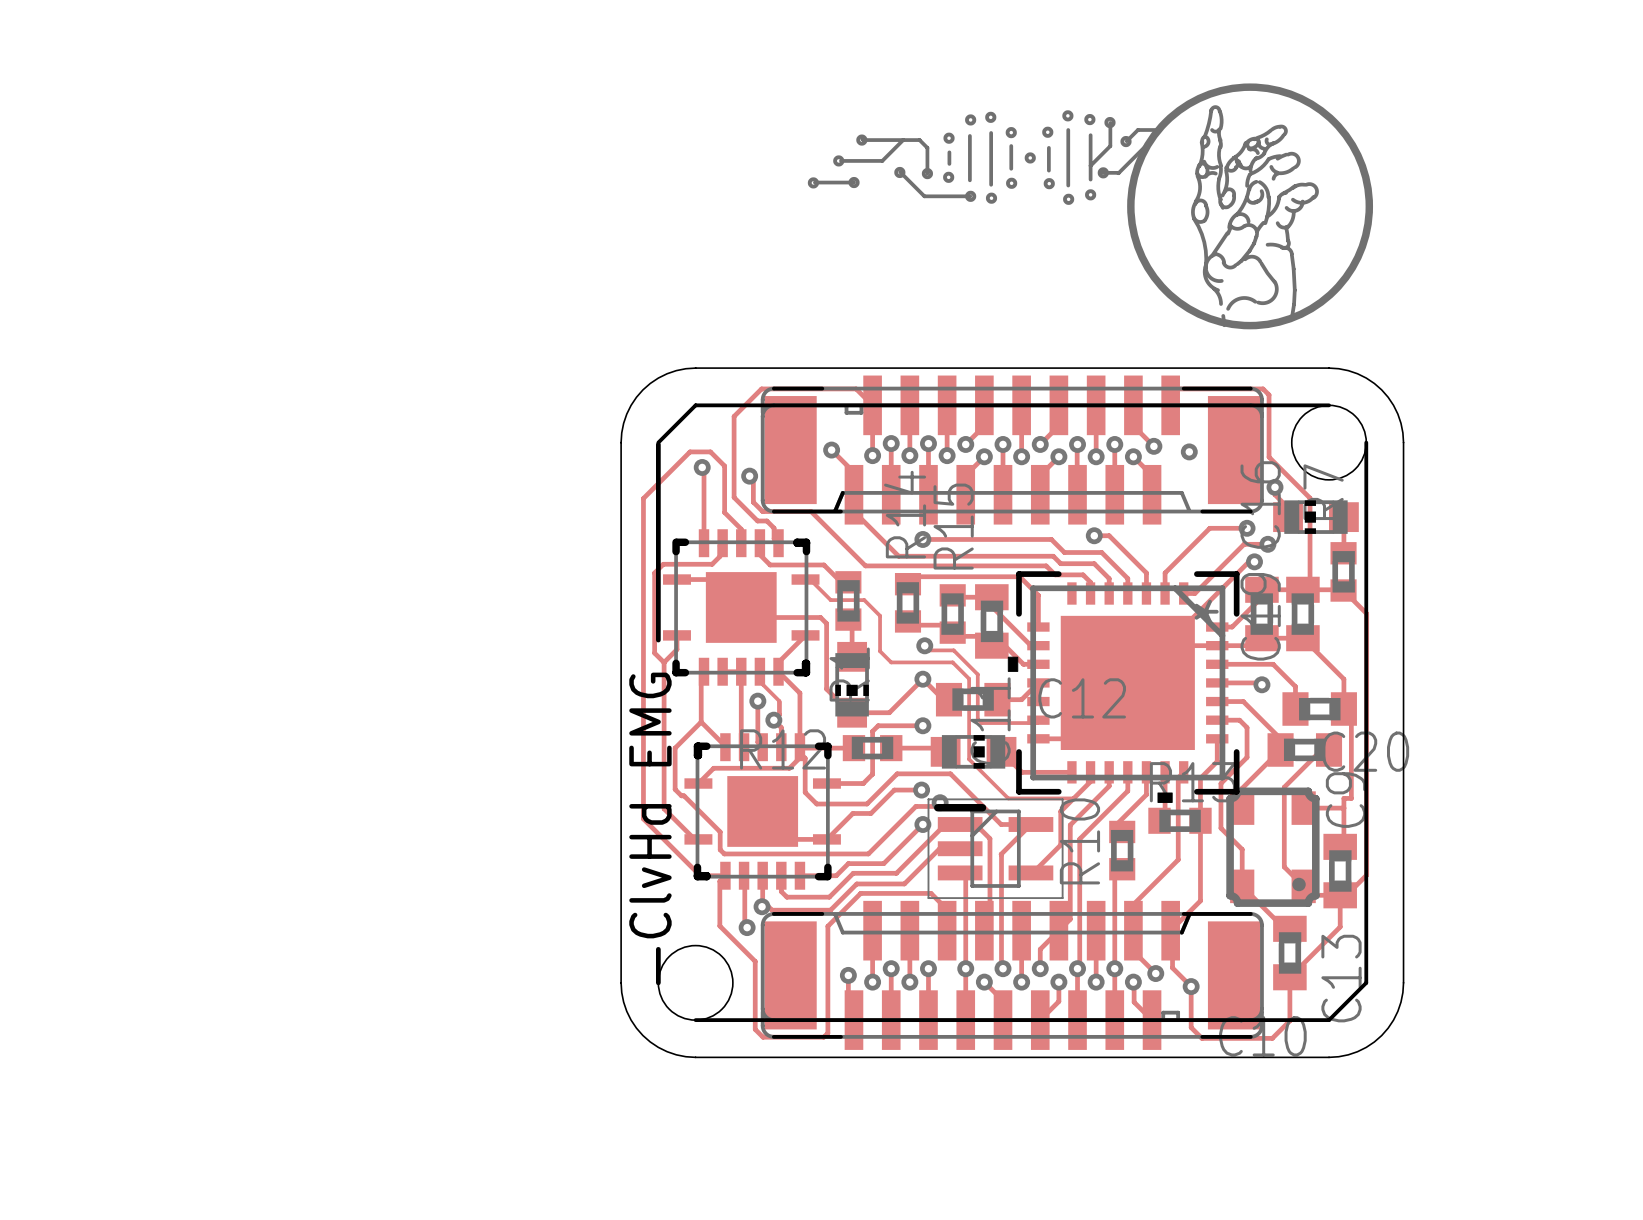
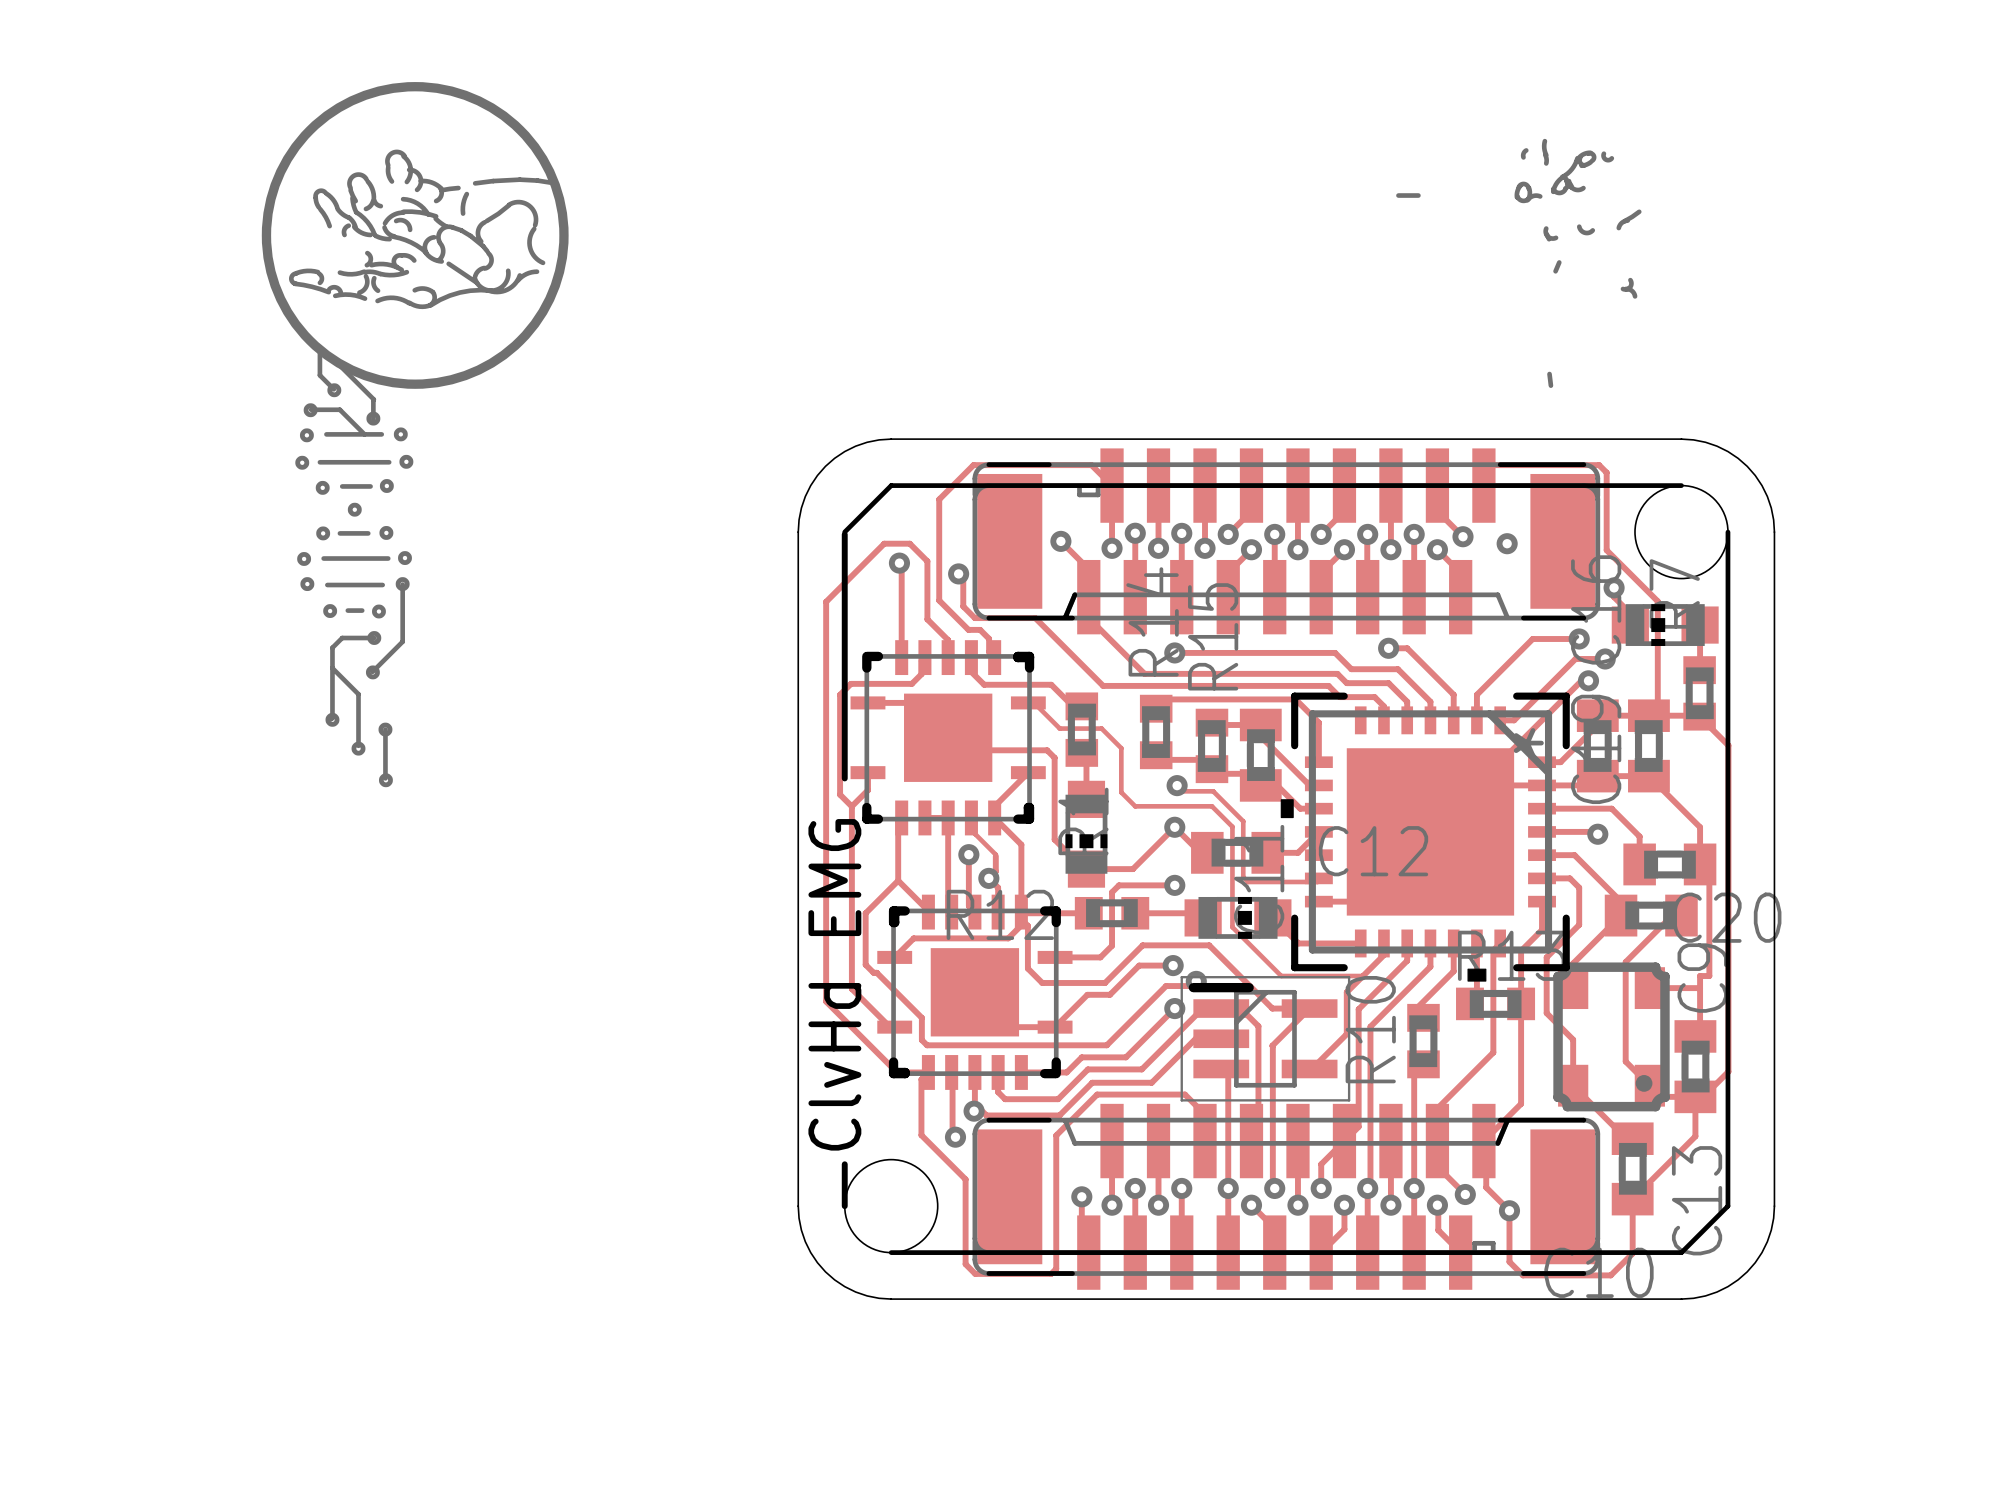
drawing: none -> [261, 82, 569, 788]
drawing: [807, 83, 1374, 330] -> none
line: (1211, 109) (1204, 137) -> none
line: (1211, 111) (1215, 107) (1219, 111) -> (388, 165) (387, 158) (392, 153) (398, 152) (404, 155)
line: (1219, 111) (1220, 128) -> none
line: (1110, 122) (1110, 146) (1090, 165) -> none
line: (1279, 126) (1272, 129) -> none
line: (1280, 126) (1285, 128) (1284, 134) -> none
line: (1219, 129) (1215, 131) (1212, 130) -> none
line: (1068, 130) (1068, 185) -> none
line: (1160, 130) (1137, 130) (1126, 141) -> none
line: (1270, 130) (1257, 137) -> none
line: (991, 132) (991, 184) -> none
line: (969, 135) (969, 180) -> none
line: (1090, 135) (1090, 179) -> none
line: (1283, 135) (1272, 143) -> none
line: (1206, 137) (1208, 142) (1204, 146) -> (488, 253) (491, 261) (485, 268)
line: (862, 138) (919, 140) (927, 147) (927, 173) -> none
line: (903, 140) (882, 160) (840, 160) -> none
line: none -> (403, 156) (410, 168) (406, 181)
line: (1201, 142) (1202, 154) (1199, 166) -> none
line: (1258, 142) (1259, 146) (1263, 148) -> none
line: (1271, 144) (1263, 154) (1256, 158) -> none
line: (1011, 146) (1011, 168) -> none
line: (1145, 146) (1118, 173) -> none
line: (1220, 146) (1218, 155) (1221, 165) -> none
line: (1048, 147) (1048, 170) -> none
line: (1250, 149) (1254, 149) (1257, 153) -> none
line: none -> (388, 167) (388, 174) (391, 181)
line: none -> (409, 169) (415, 171) (420, 177) (420, 183) (417, 189)
line: (949, 152) (949, 163) -> none
line: (1286, 154) (1277, 158) -> none
line: (1288, 154) (1293, 153) (1297, 157) (1298, 162) (1295, 167) -> none
line: (1279, 156) (1268, 159) (1260, 168) (1250, 173) -> none
line: (1256, 157) (1252, 163) (1250, 170) -> none
line: none -> (366, 179) (360, 174) (354, 175) (349, 181) (350, 188)
line: none -> (367, 181) (373, 191) (373, 202)
line: none -> (420, 181) (431, 182) (441, 188)
line: (1204, 161) (1209, 167) (1217, 166) -> none
line: none -> (475, 183) (519, 179) (552, 182) (557, 186)
line: none -> (440, 188) (441, 195) (436, 201)
line: none -> (458, 188) (441, 190)
line: (1220, 166) (1219, 178) -> none
line: (1271, 166) (1277, 172) -> none
line: none -> (350, 190) (355, 201)
line: (1293, 168) (1285, 172) (1276, 172) -> none
line: none -> (325, 192) (318, 191) (315, 197)
line: none -> (326, 193) (337, 207)
line: none -> (466, 194) (463, 203) (463, 213)
line: (1226, 171) (1226, 183) (1222, 195) -> none
line: (900, 172) (924, 196) (970, 196) -> none
line: (1278, 173) (1273, 178) -> none
line: (1249, 174) (1247, 185) -> none
line: none -> (315, 198) (318, 207)
line: none -> (352, 198) (356, 212) (367, 221) (374, 234)
line: none -> (403, 199) (417, 203) (428, 214)
line: none -> (374, 200) (380, 206)
line: (1197, 176) (1200, 189) (1195, 201) -> none
line: none -> (372, 201) (365, 208)
line: (1219, 178) (1218, 189) (1220, 199) -> none
line: none -> (509, 204) (519, 202) (529, 205) (535, 214) (535, 225)
line: none -> (509, 205) (486, 221)
line: (1256, 181) (1249, 189) -> (484, 267) (478, 270) (475, 276)
line: (814, 182) (854, 182) -> none
line: (1259, 182) (1266, 188) (1268, 197) -> none
line: none -> (320, 209) (329, 226)
line: none -> (337, 208) (350, 219) (355, 228)
line: (1304, 184) (1293, 187) -> (537, 271) (526, 274) (517, 280)
line: (1306, 184) (1311, 184) (1316, 187) (1316, 193) (1313, 197) -> none
line: none -> (403, 211) (420, 212) (436, 216)
line: none -> (403, 212) (392, 215) (385, 223)
line: (1248, 189) (1244, 203) (1236, 215) -> none
line: none -> (435, 218) (446, 226)
line: (1224, 191) (1230, 189) (1234, 195) -> none
line: (1261, 191) (1261, 198) (1254, 202) -> none
line: none -> (396, 221) (405, 221) (410, 229)
line: none -> (484, 222) (478, 231) (481, 241)
line: (1234, 195) (1229, 205) -> none
line: (1279, 196) (1275, 208) (1266, 216) -> none
line: none -> (348, 225) (344, 229) (344, 234)
line: (1269, 197) (1265, 223) -> none
line: (1313, 197) (1303, 202) (1292, 199) -> none
line: none -> (354, 227) (361, 232) (370, 234)
line: none -> (384, 227) (388, 233) (394, 236)
line: none -> (534, 228) (529, 238) (530, 248) (534, 256) (543, 262)
line: (1196, 201) (1193, 210) (1194, 218) -> none
line: (1302, 201) (1301, 206) (1296, 210) (1291, 210) (1286, 207) -> none
line: (1195, 204) (1201, 200) (1206, 205) -> none
line: none -> (375, 235) (389, 239)
line: none -> (393, 236) (411, 242) (426, 252)
line: none -> (434, 237) (426, 241) (425, 250)
line: (1206, 206) (1207, 213) (1204, 220) (1198, 221) (1194, 218) -> none
line: none -> (439, 241) (440, 230) (450, 226) (470, 235) (487, 251)
line: none -> (439, 242) (443, 252) (438, 260)
line: (1293, 210) (1292, 219) (1287, 227) -> none
line: (1237, 214) (1231, 219) (1229, 227) -> none
line: (1237, 214) (1244, 215) (1248, 221) -> none
line: none -> (424, 251) (432, 258) (441, 261)
line: none -> (367, 253) (370, 259) (366, 265)
line: (1194, 219) (1204, 242) (1205, 267) -> none
line: none -> (401, 255) (394, 259) (397, 267)
line: (1263, 222) (1257, 231) -> none
line: (1277, 223) (1282, 227) (1288, 226) -> none
line: (1229, 225) (1236, 228) (1244, 226) -> none
line: (1245, 225) (1253, 226) (1256, 234) (1249, 250) (1237, 264) -> none
line: none -> (448, 263) (477, 282)
line: (1286, 227) (1288, 241) -> none
line: none -> (371, 265) (387, 264) (401, 269)
line: none -> (364, 271) (352, 274) (339, 272)
line: none -> (508, 270) (505, 283) (494, 290) (482, 288) (474, 277)
line: (1227, 233) (1212, 255) -> none
line: none -> (318, 272) (307, 270) (296, 273)
line: none -> (365, 272) (380, 274)
line: none -> (406, 272) (393, 275) (380, 274)
line: none -> (296, 273) (291, 278) (296, 283)
line: none -> (319, 274) (321, 278) (319, 282)
line: none -> (519, 275) (516, 282) (507, 289) (497, 292) (489, 290)
line: none -> (365, 276) (366, 286) (359, 292)
line: none -> (374, 278) (373, 285) (378, 290)
line: none -> (294, 283) (328, 292)
line: (1267, 244) (1283, 247) -> none
line: none -> (329, 289) (336, 287) (340, 292)
line: none -> (414, 290) (424, 288) (432, 292) (434, 299) (430, 305)
line: none -> (491, 290) (459, 292) (431, 305)
line: none -> (335, 295) (350, 294) (365, 298)
line: (1216, 254) (1207, 260) (1206, 270) (1211, 278) (1221, 280) -> none
line: (1217, 254) (1224, 261) -> (402, 255) (408, 256) (414, 260)
line: (1291, 254) (1294, 290) (1292, 316) (1289, 320) -> none
line: none -> (377, 300) (393, 297) (409, 303)
line: none -> (409, 302) (419, 306) (430, 305)
line: (1245, 259) (1253, 256) (1260, 261) -> none
line: (1223, 262) (1228, 267) (1235, 265) -> none
line: (1261, 263) (1274, 281) -> none
line: (1205, 265) (1206, 280) (1218, 290) -> none
line: (1274, 281) (1276, 289) (1273, 297) (1266, 302) (1258, 302) -> none
line: (1213, 288) (1219, 295) (1221, 304) -> none
line: none -> (319, 347) (319, 375) (333, 389)
line: (1255, 301) (1248, 298) (1239, 298) (1232, 302) (1228, 308) -> none
line: none -> (340, 366) (373, 399)
line: none -> (373, 399) (373, 419)
line: none -> (311, 409) (339, 409) (364, 434)
line: none -> (326, 434) (381, 434)
line: none -> (319, 462) (389, 462)
line: none -> (342, 486) (370, 486)
line: none -> (339, 533) (368, 533)
line: none -> (323, 558) (388, 558)
line: none -> (402, 584) (402, 641) (372, 671)
line: none -> (327, 585) (382, 585)
line: none -> (347, 610) (362, 610)
line: none -> (374, 638) (342, 638) (332, 647) (331, 719)
line: none -> (332, 668) (358, 694) (358, 745)
line: none -> (385, 729) (385, 778)

